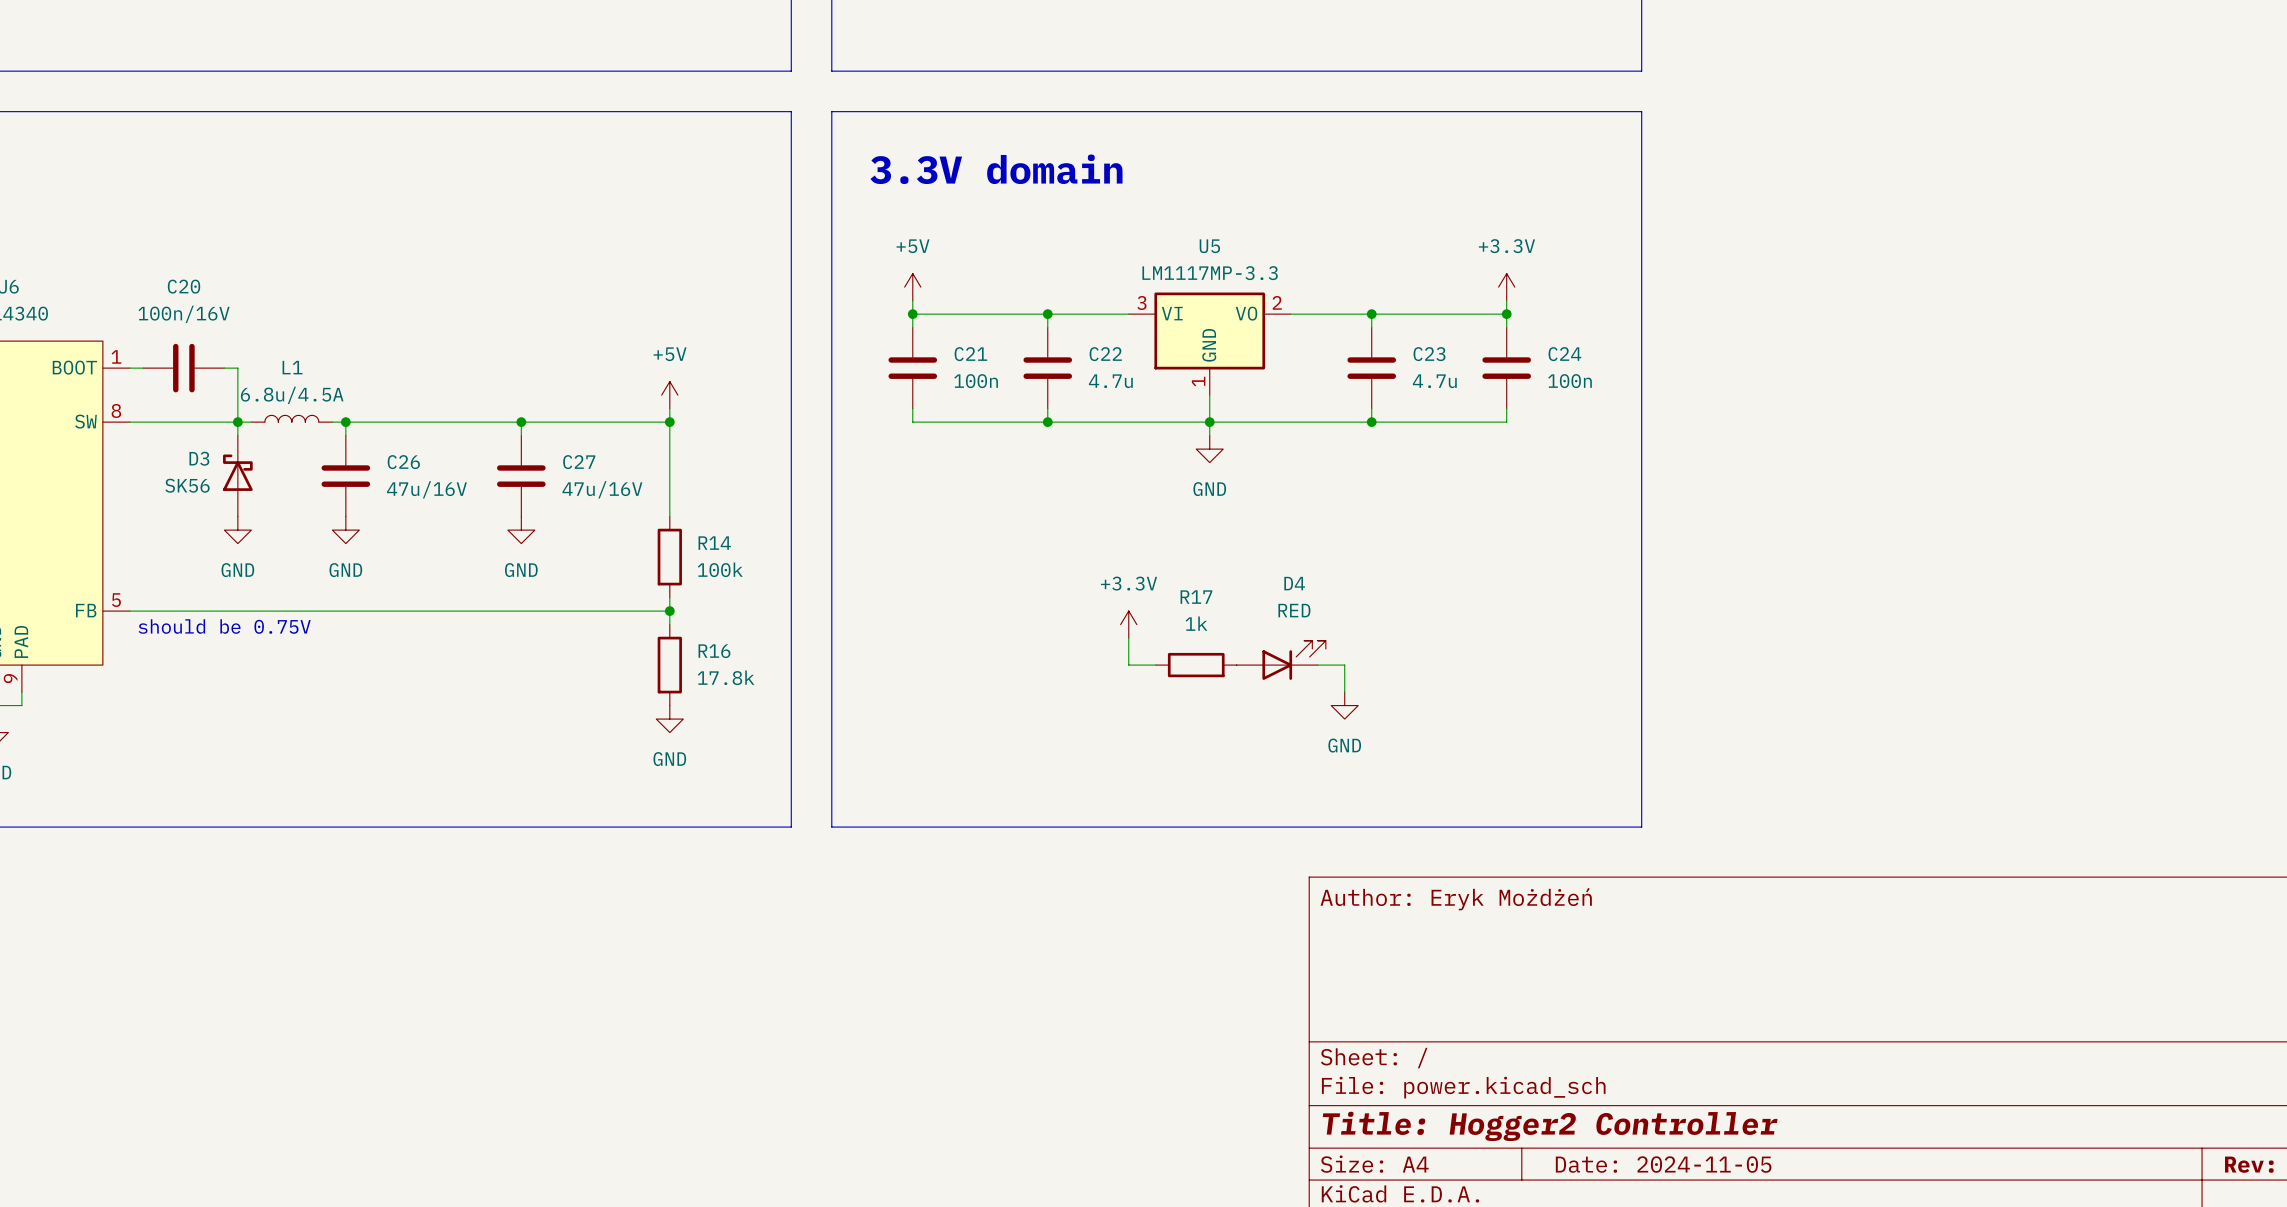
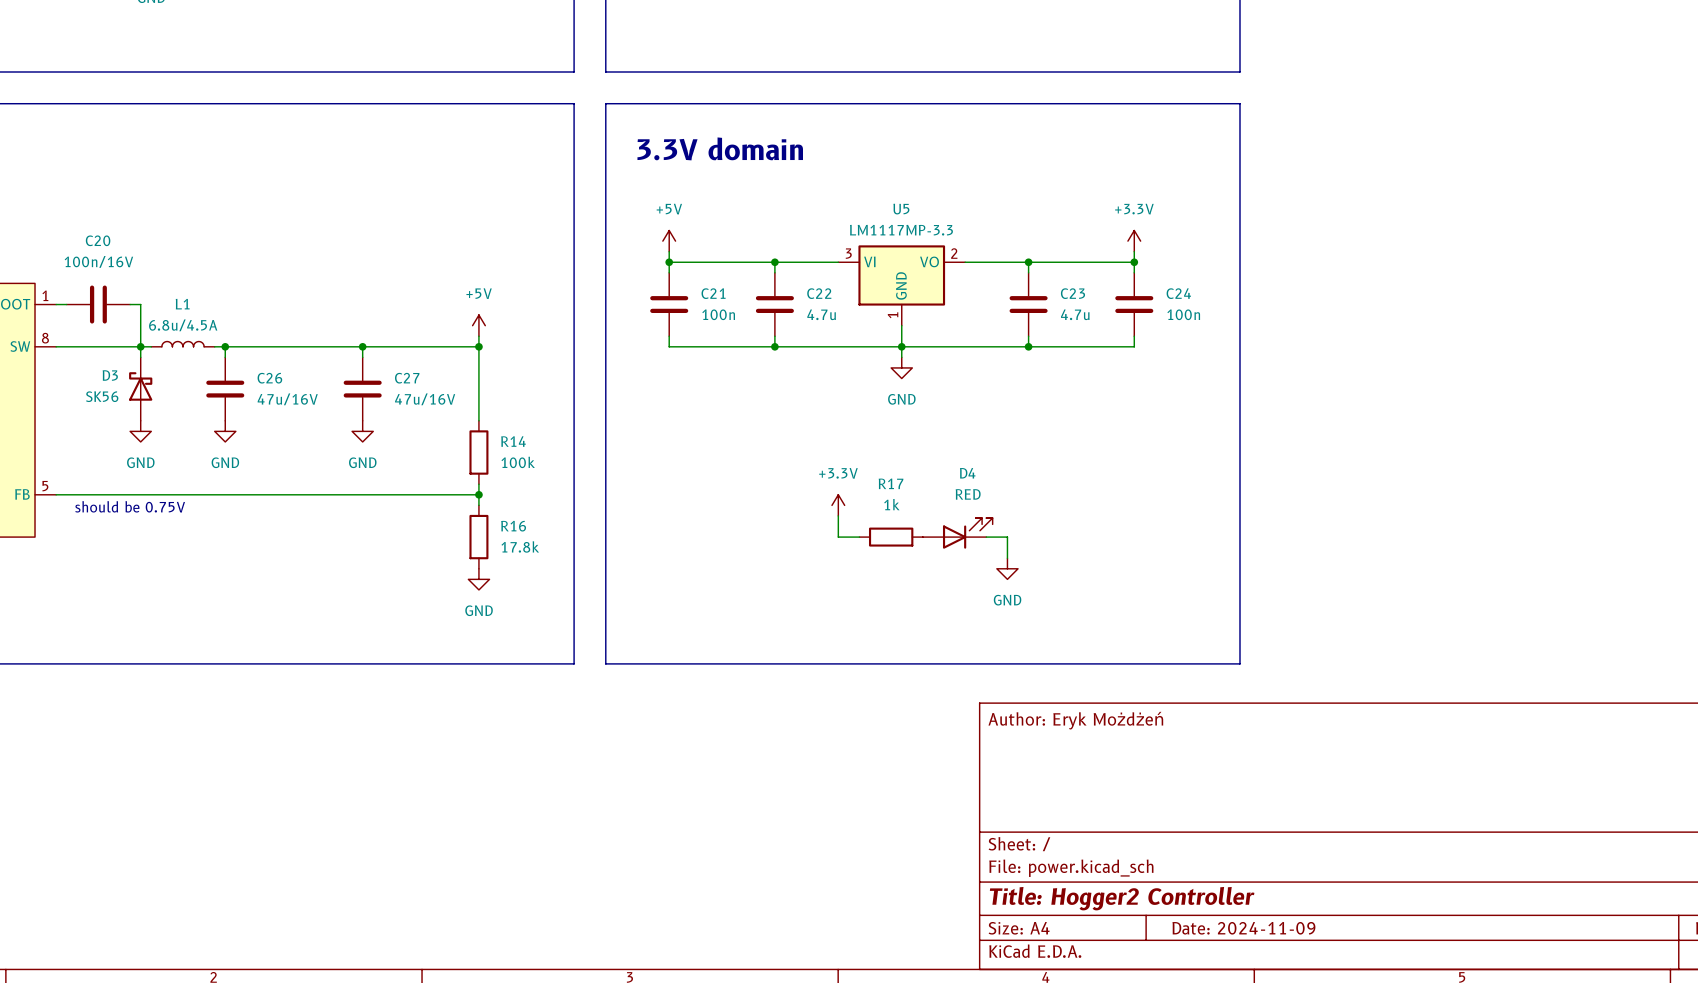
title block: Date: 2024-11-05 (1663, 1164) -> Date: 2024-11-09 (1243, 928)

